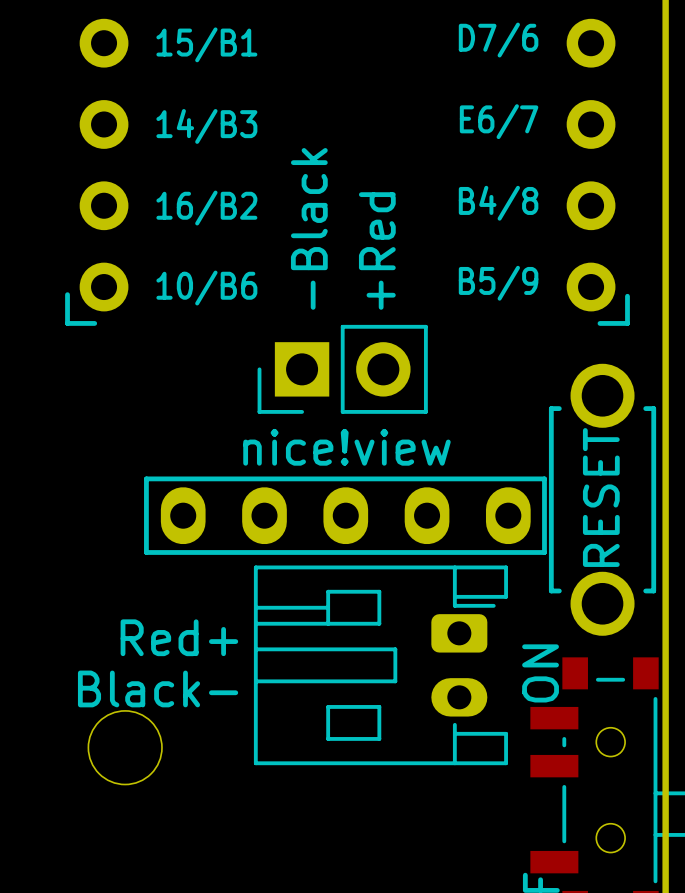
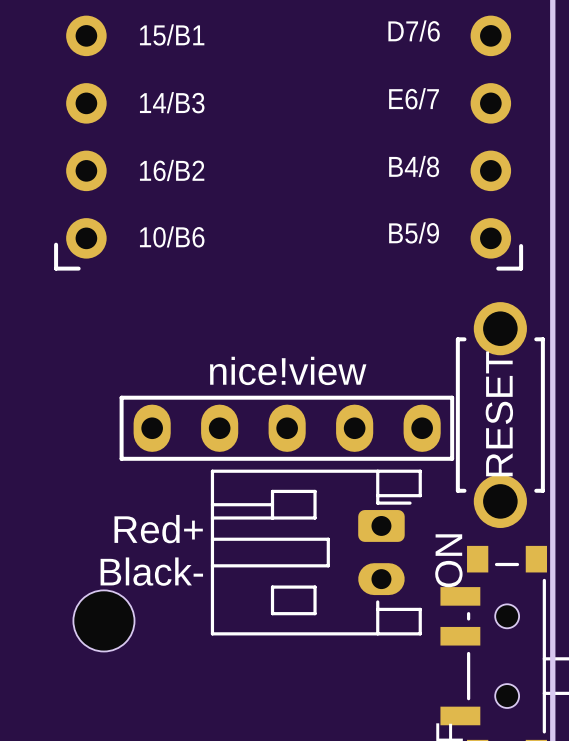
text: -Black (309, 228) -> none
text: +Red (377, 251) -> none
part: (342, 369) -> none

